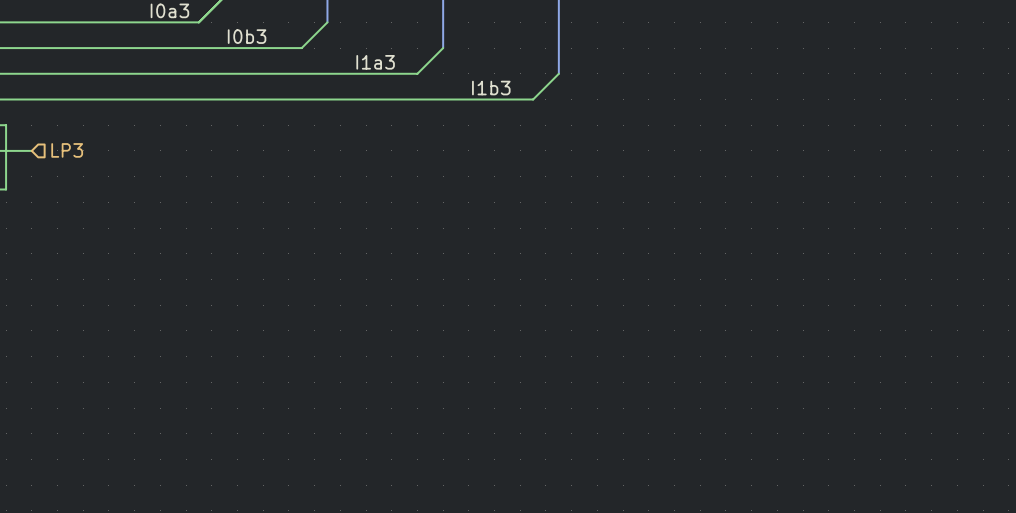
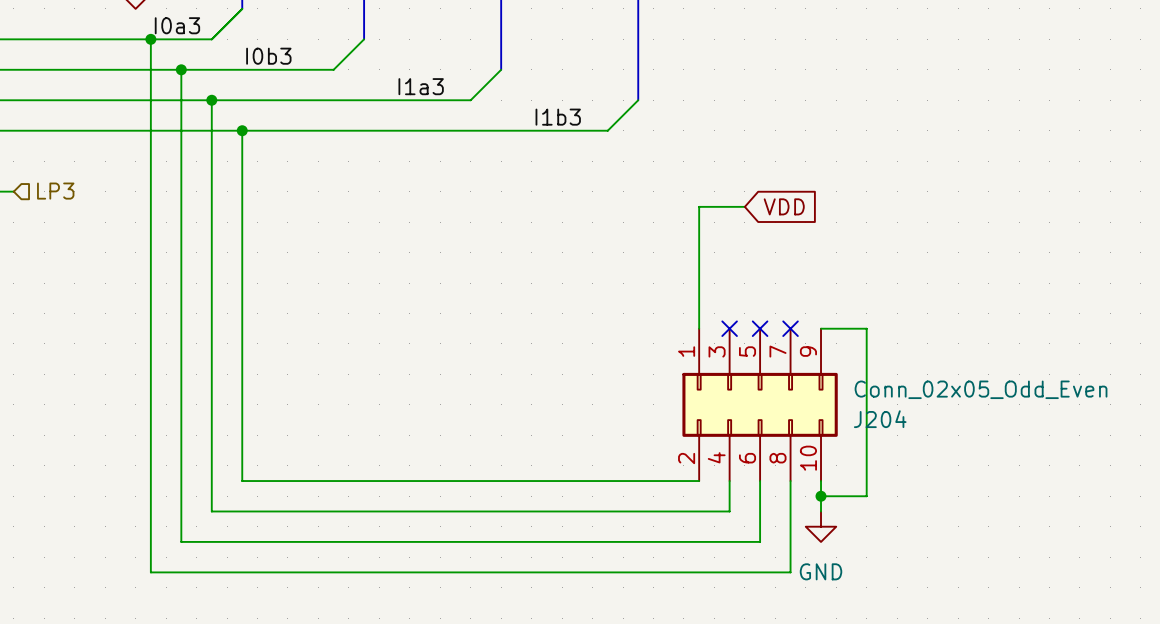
wire: none -> (150, 39) (150, 572) (790, 572) (790, 481)
junction: none -> (150, 39)
wire: none -> (181, 69) (181, 541) (760, 541) (760, 481)
junction: none -> (181, 69)
wire: none -> (211, 100) (211, 511) (729, 511) (729, 481)
junction: none -> (211, 100)
wire: none -> (242, 130) (242, 481) (699, 481)
junction: none -> (242, 130)
wire: none -> (744, 206) (699, 206) (699, 328)
global label: none -> VDD (784, 206)
no-connect mark: none -> (729, 328)
no-connect mark: none -> (760, 328)
no-connect mark: none -> (790, 328)
wire: none -> (821, 328) (866, 328) (866, 496) (821, 496)
J204: none -> Conn_02x05_Odd_Even (760, 404)
wire: none -> (821, 481) (821, 511)
junction: none -> (821, 496)
power symbol: none -> GND (821, 526)

